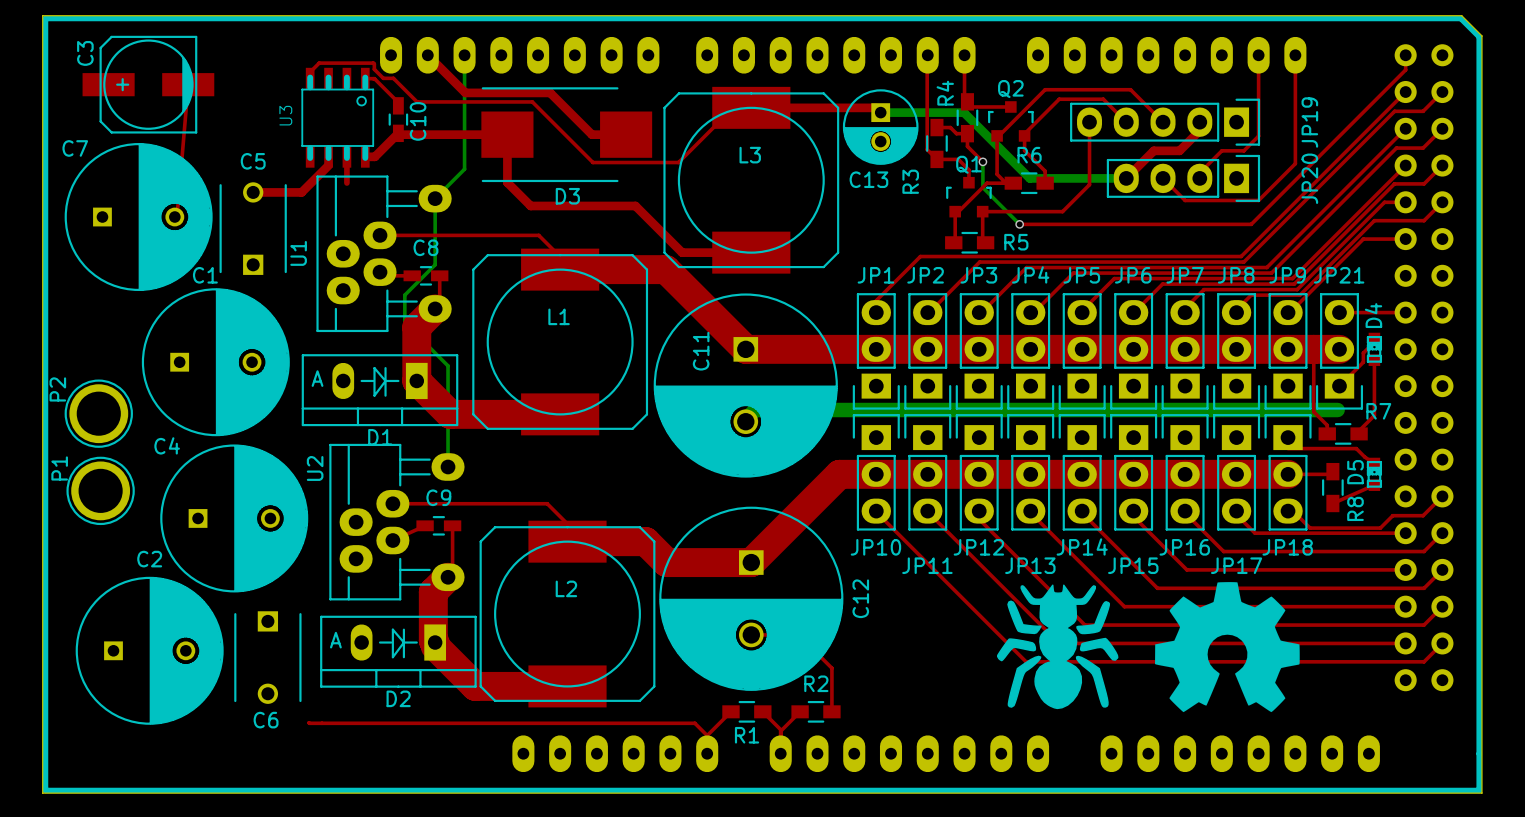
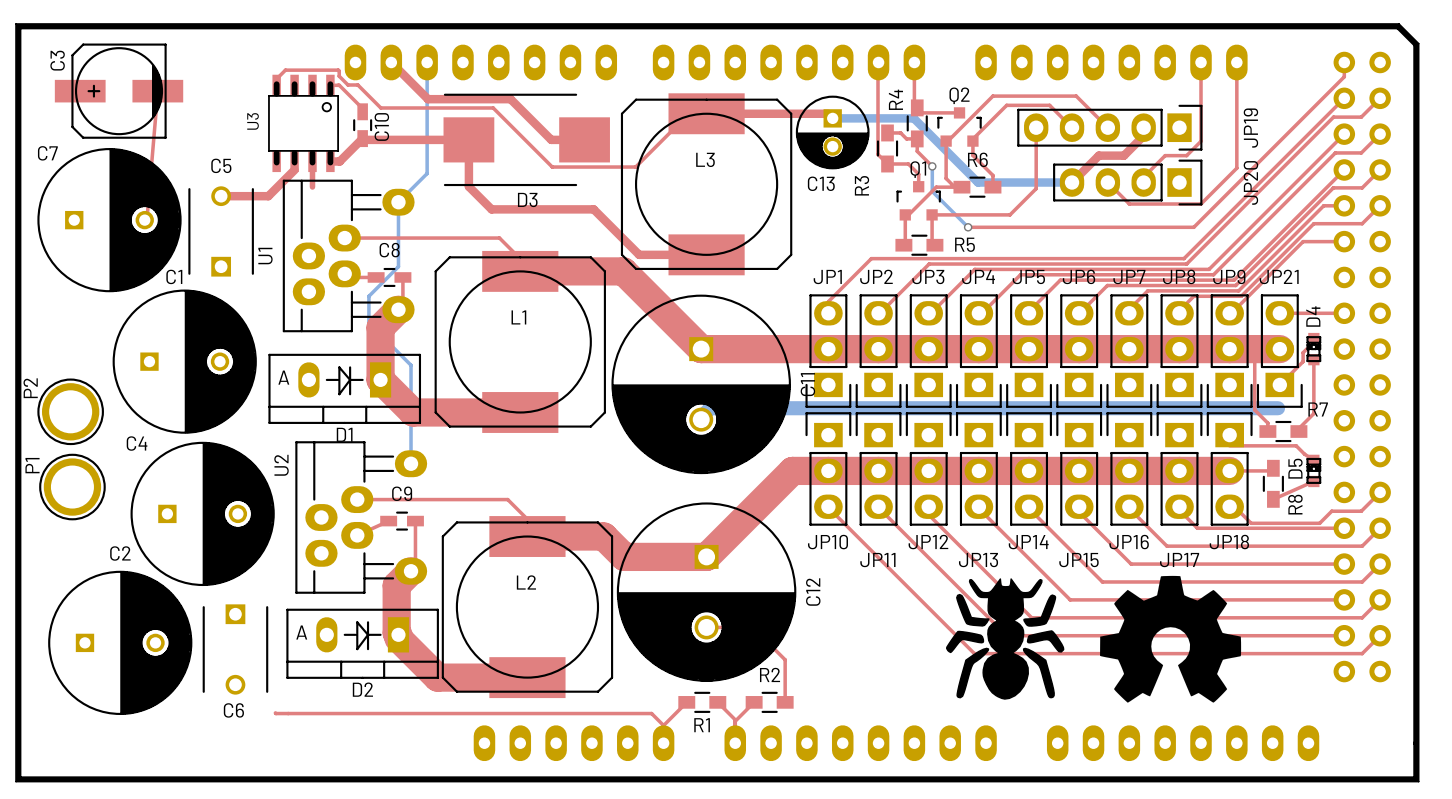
C11 name position: C11 (701, 351) -> C11 (807, 384)

